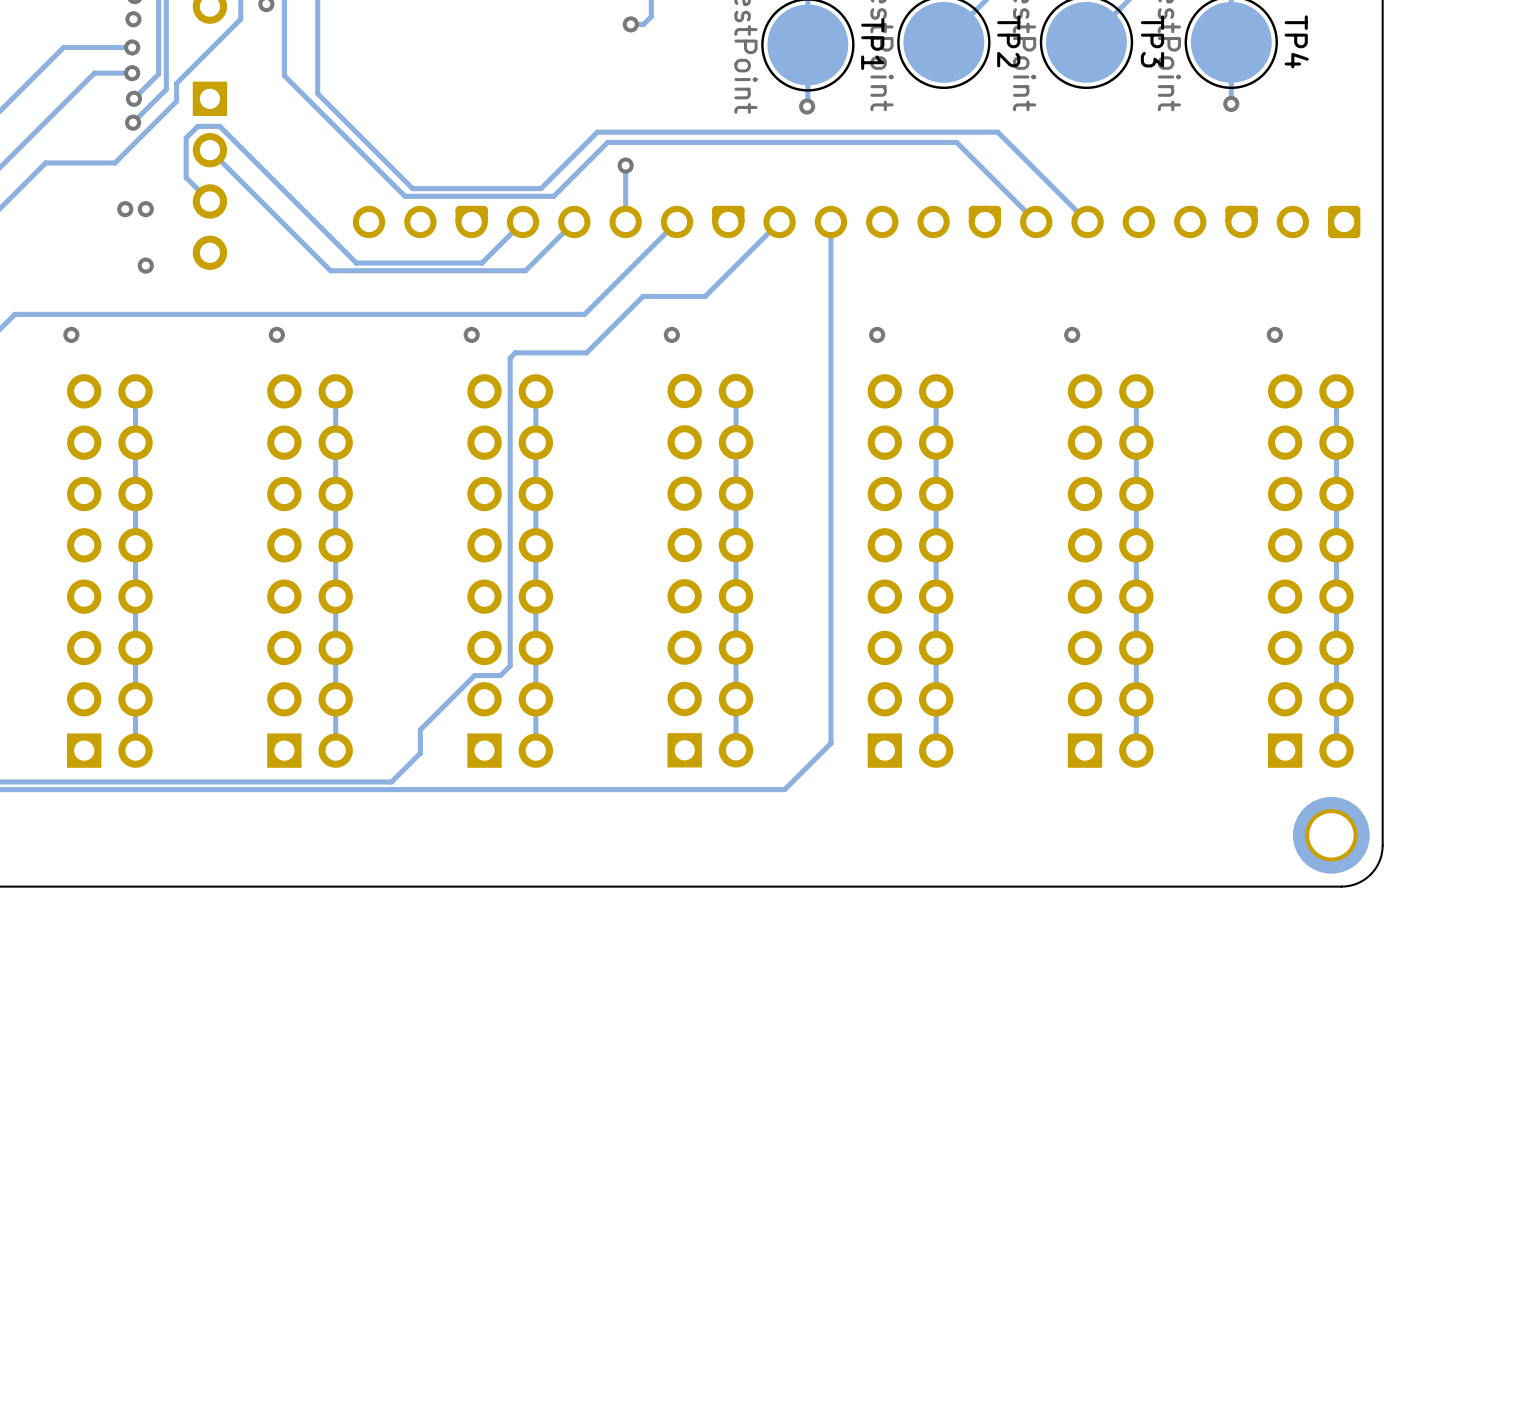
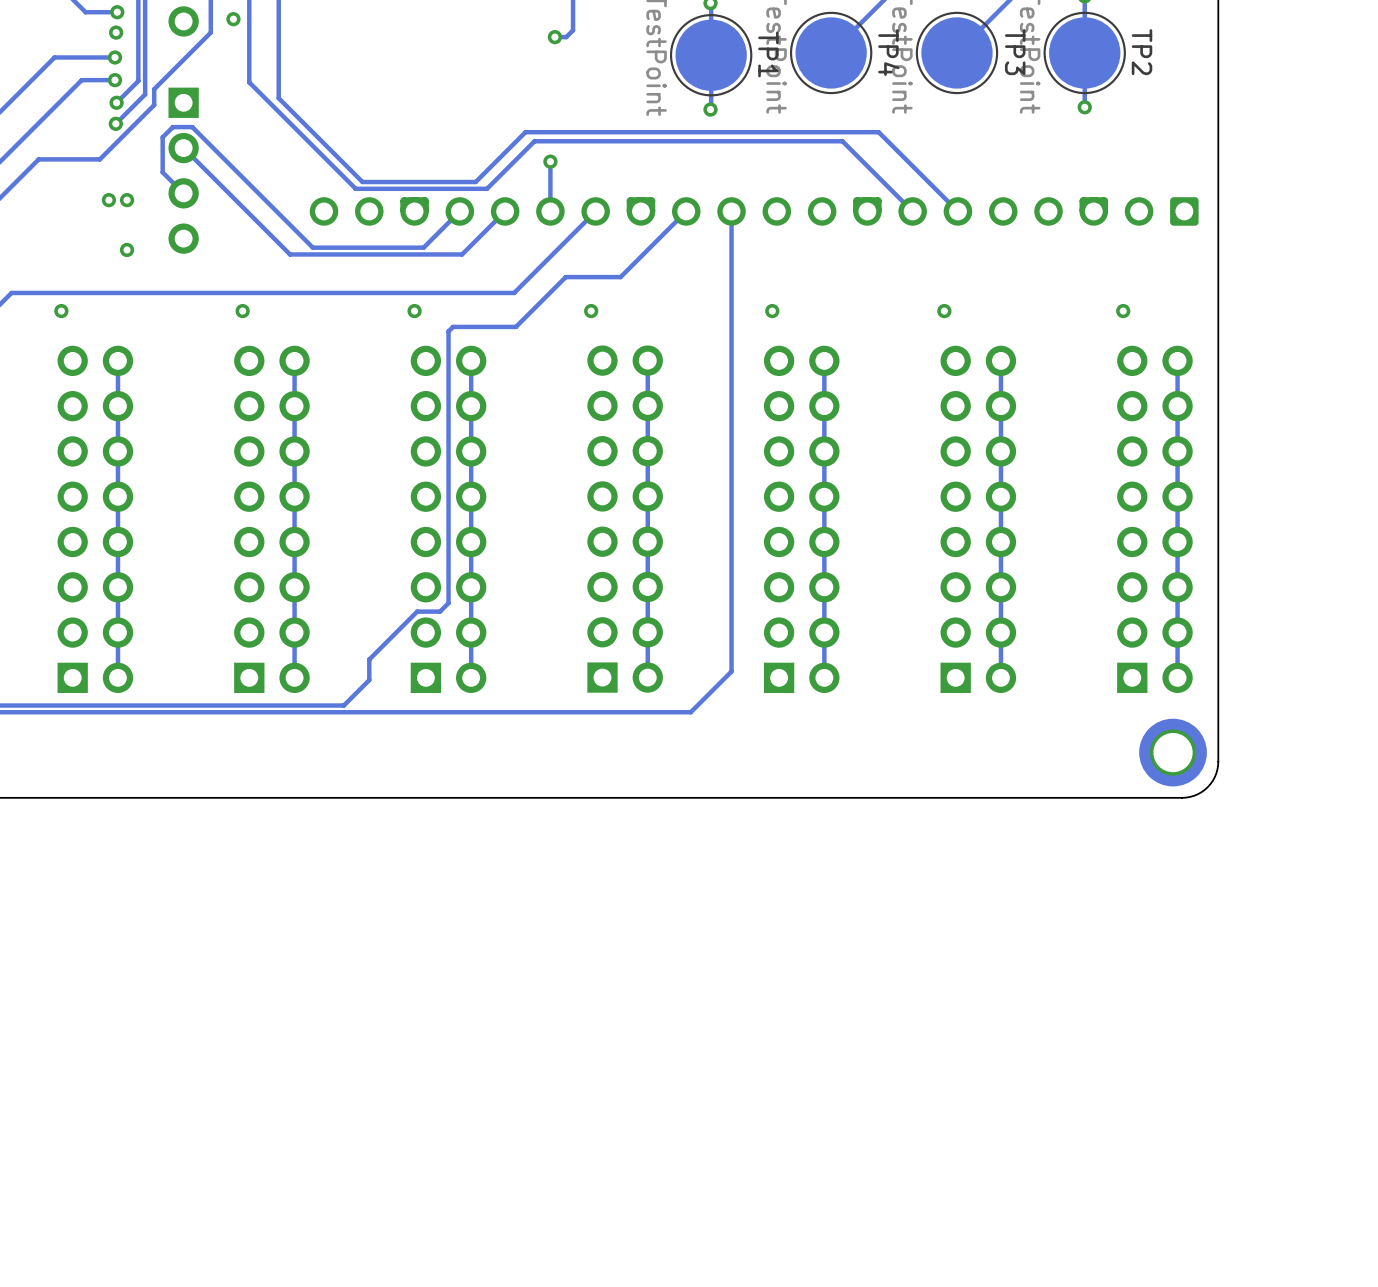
TP2 name: TP2 (1008, 41) -> TP4 (888, 52)
TP4 name: TP4 (1296, 41) -> TP2 (1142, 52)

